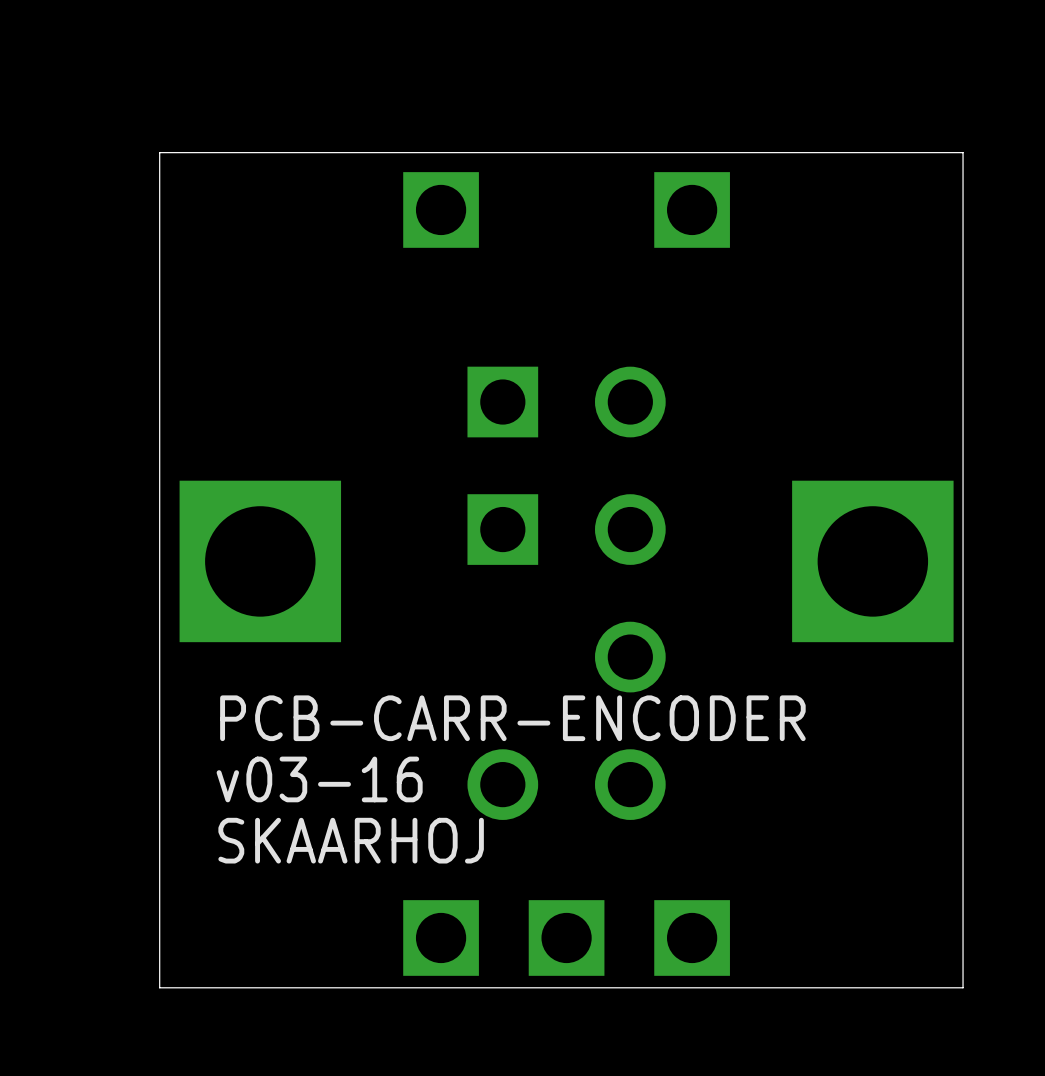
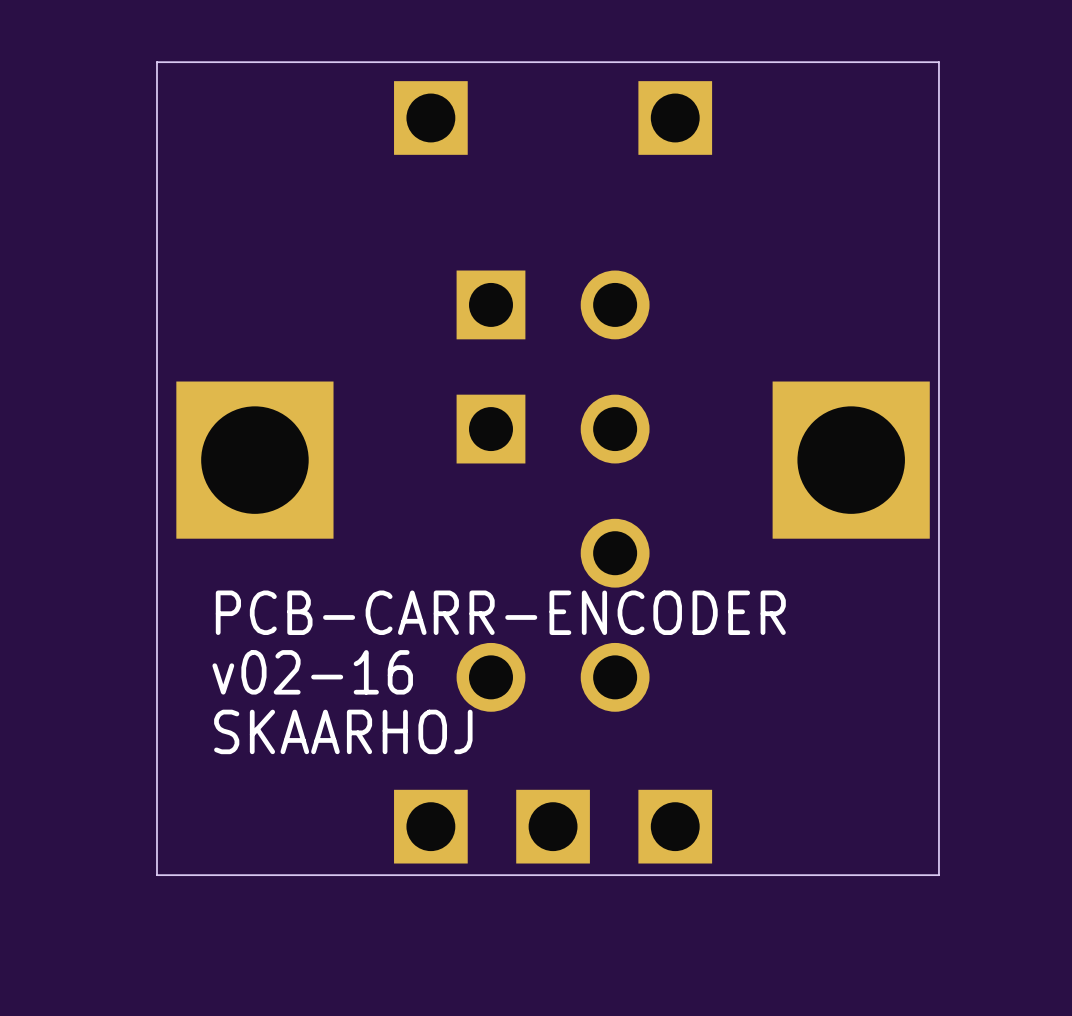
text: v03-16 (319, 779) -> v02-16 (312, 672)

